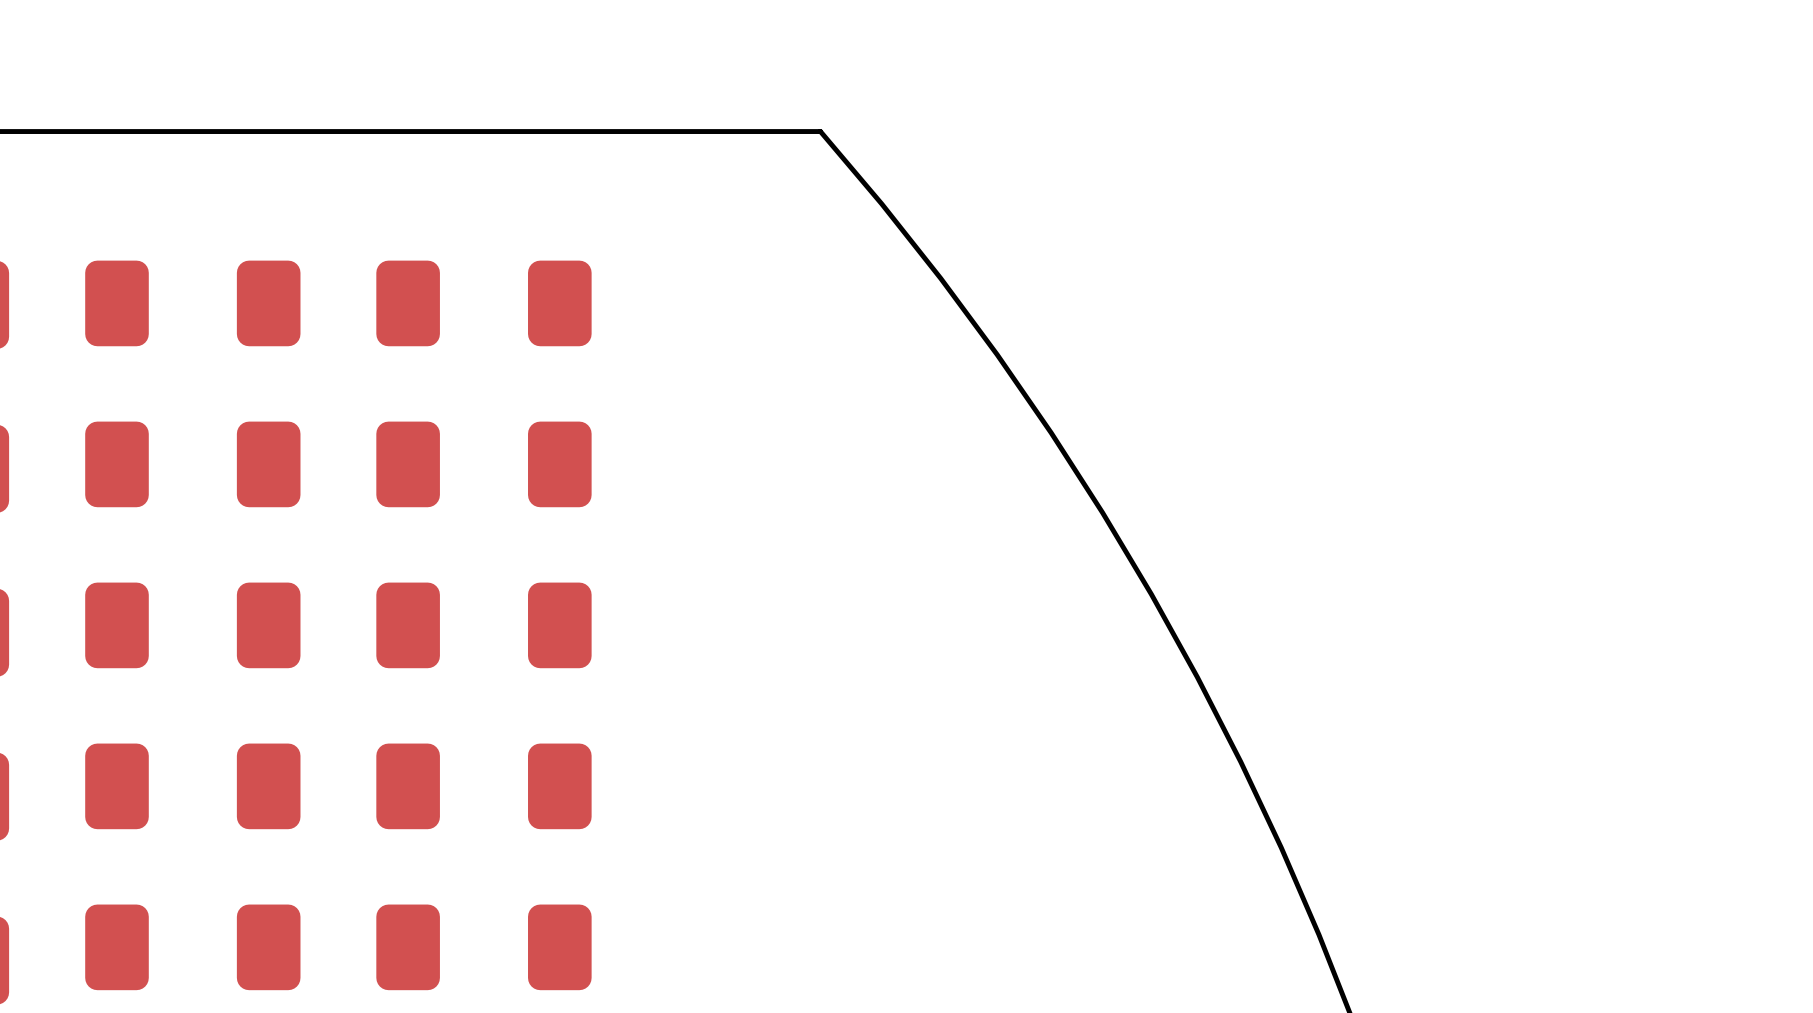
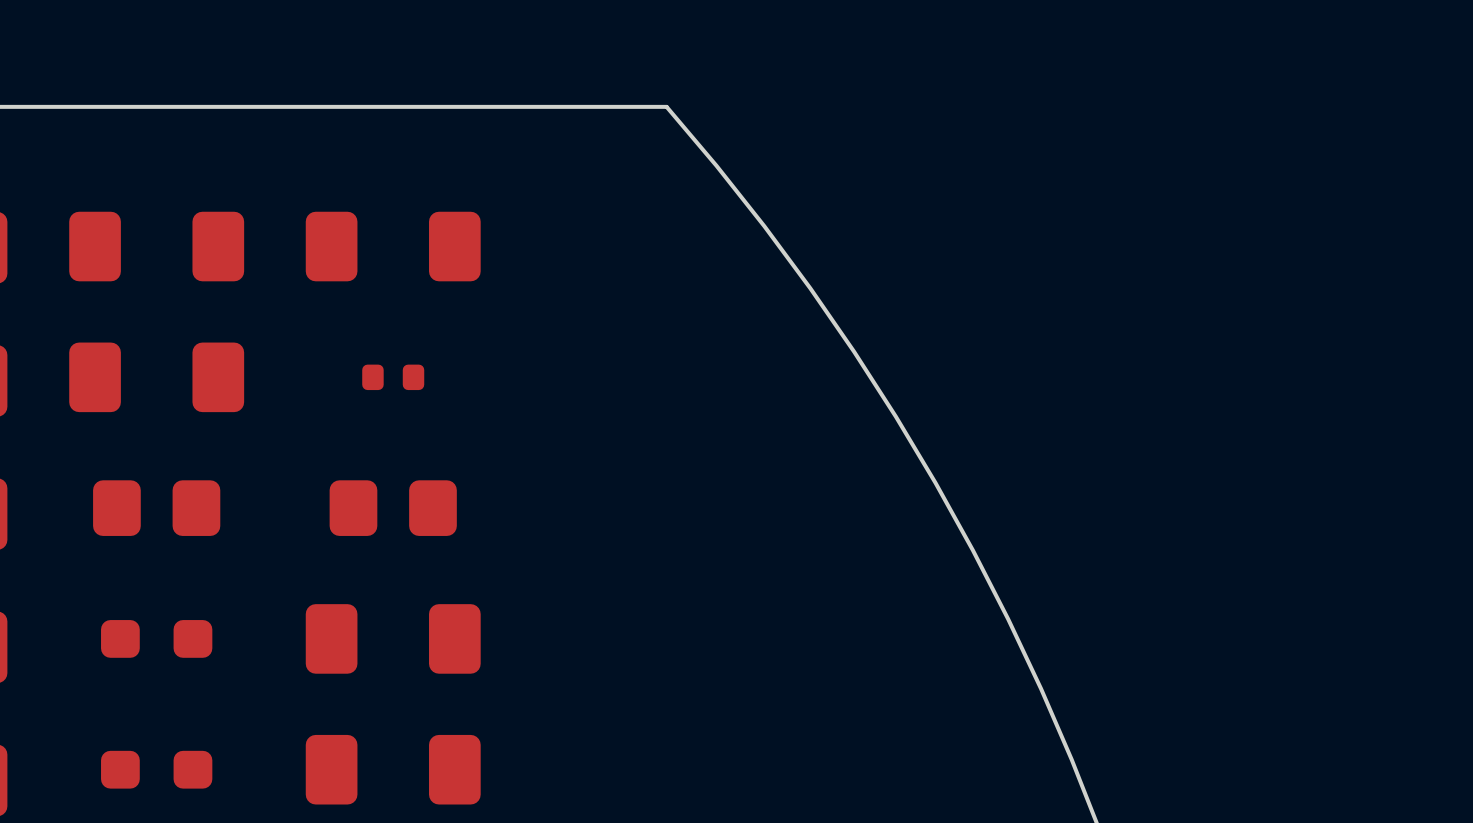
part footprint: [376, 421, 592, 508] -> [362, 364, 425, 391]
part footprint: [85, 582, 301, 669] -> [93, 480, 221, 536]
part footprint: [376, 582, 592, 669] -> [329, 480, 457, 536]
part footprint: [85, 743, 301, 830] -> [101, 620, 213, 658]
part footprint: [85, 904, 301, 991] -> [101, 750, 213, 789]

